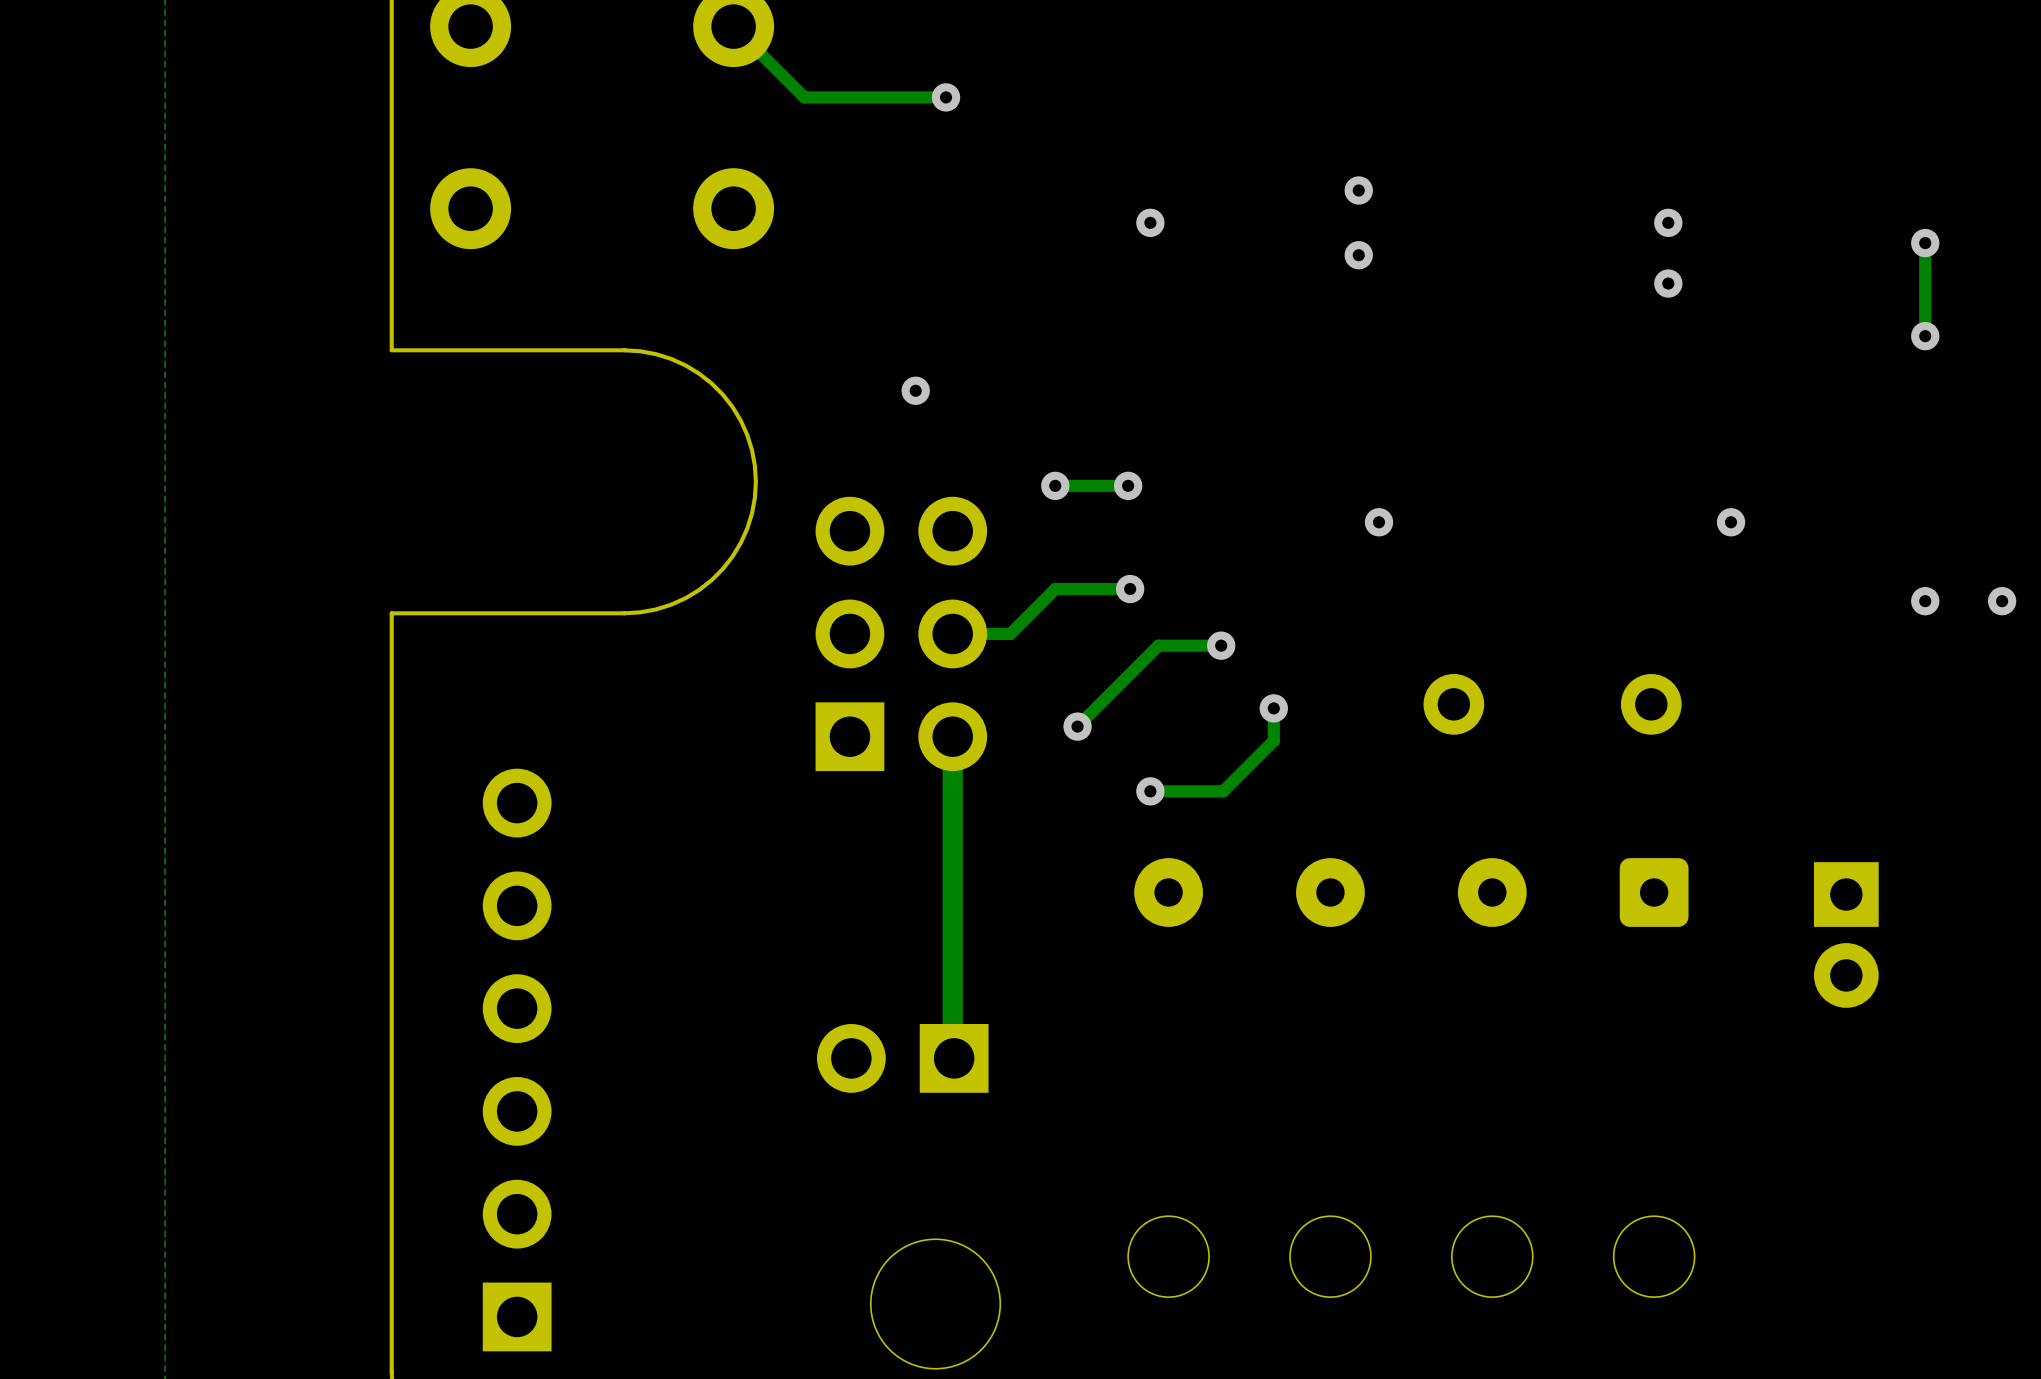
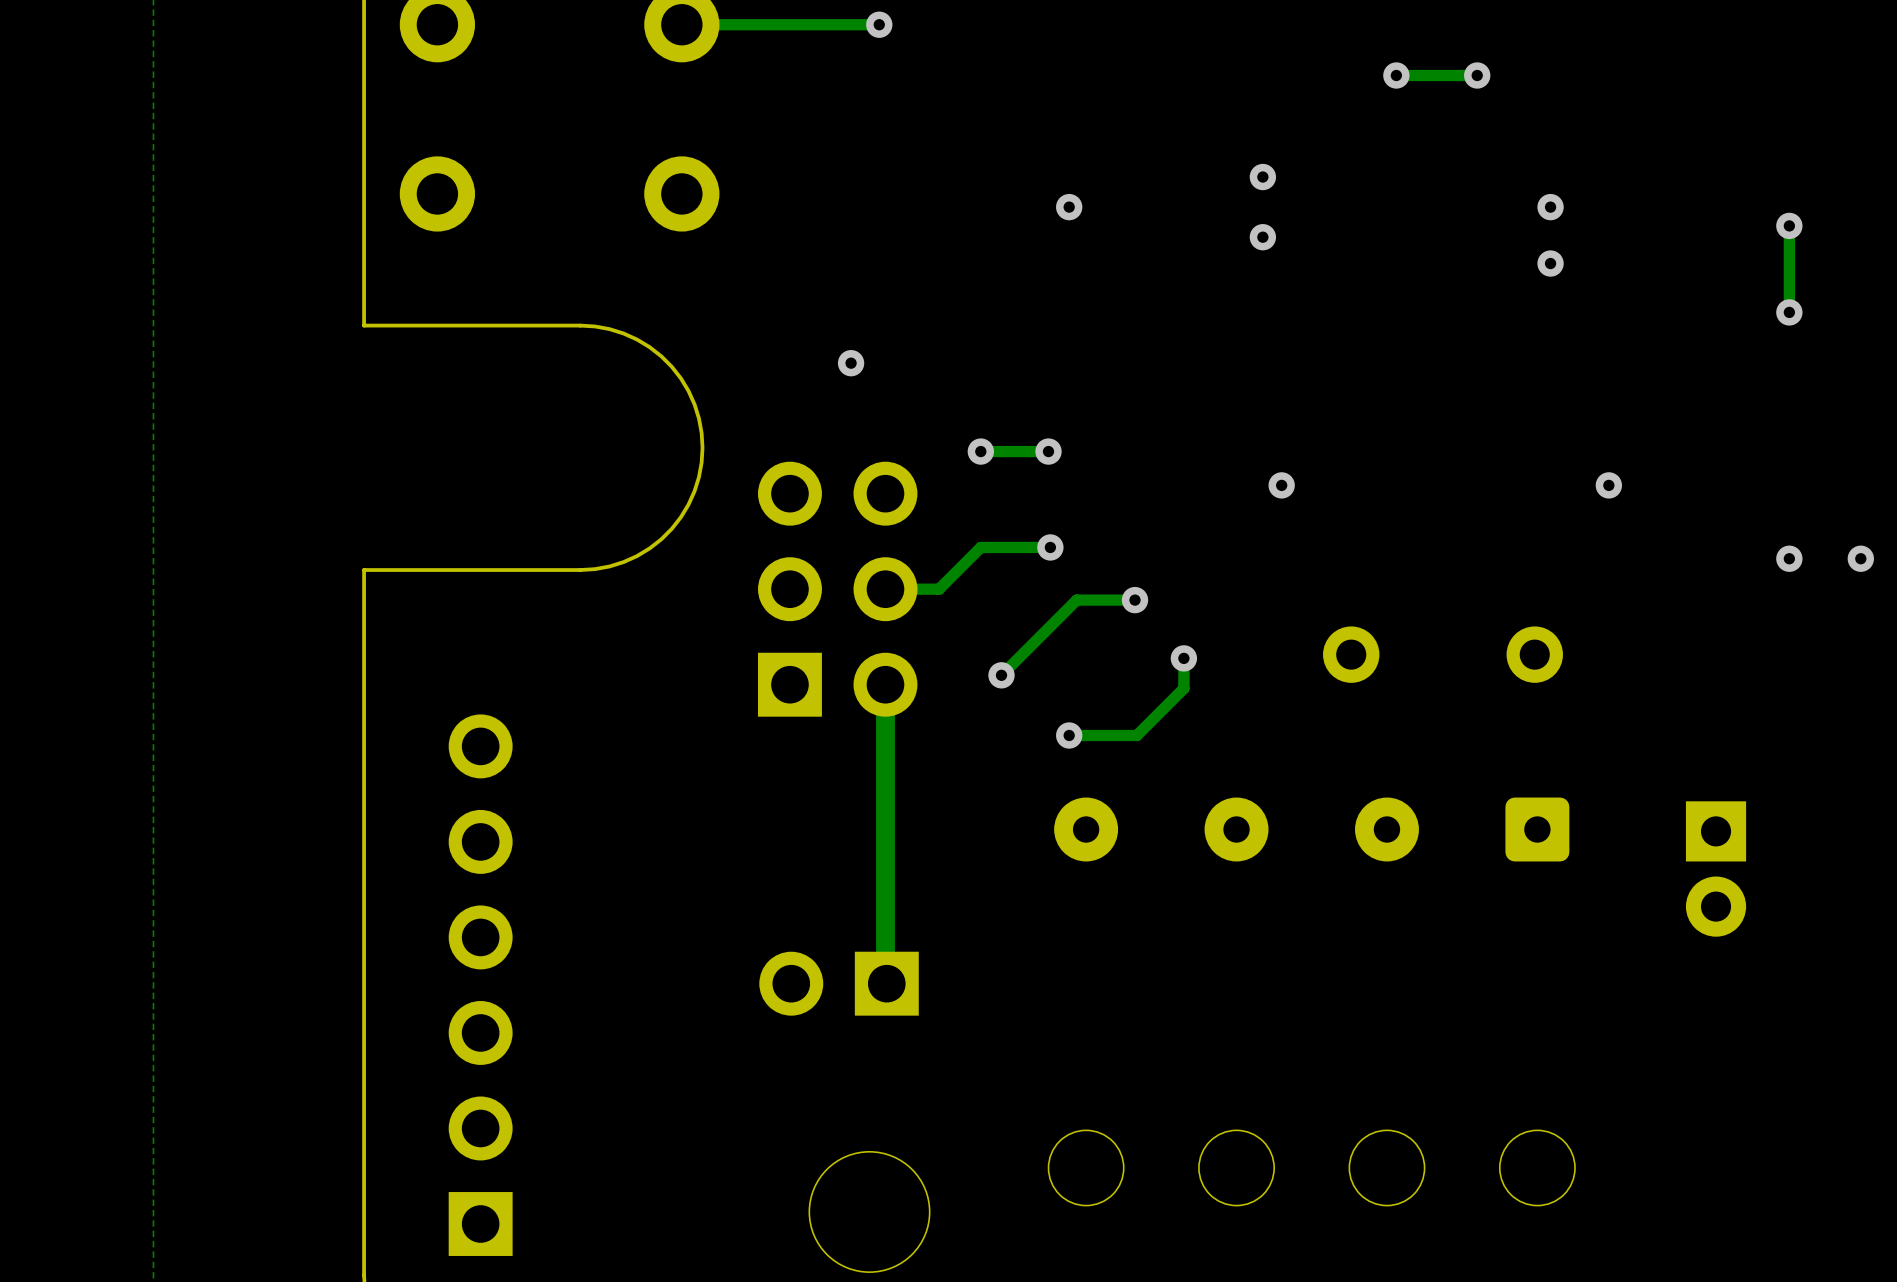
track: (733, 26) (804, 97) (946, 97) -> (681, 24) (879, 24)
via: none -> (879, 24)
via: none -> (1396, 75)
track: none -> (1477, 75) (1396, 75)
via: none -> (1477, 75)
via: (946, 97) -> none

